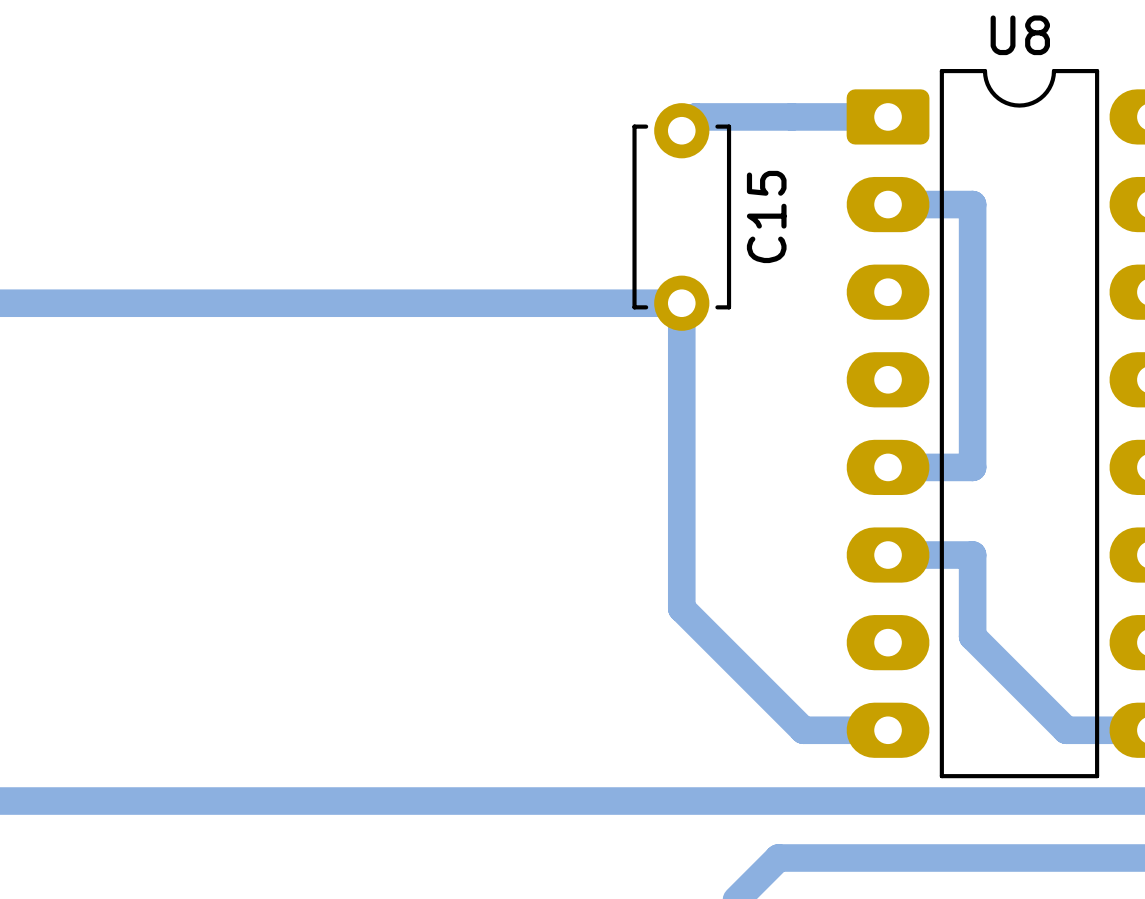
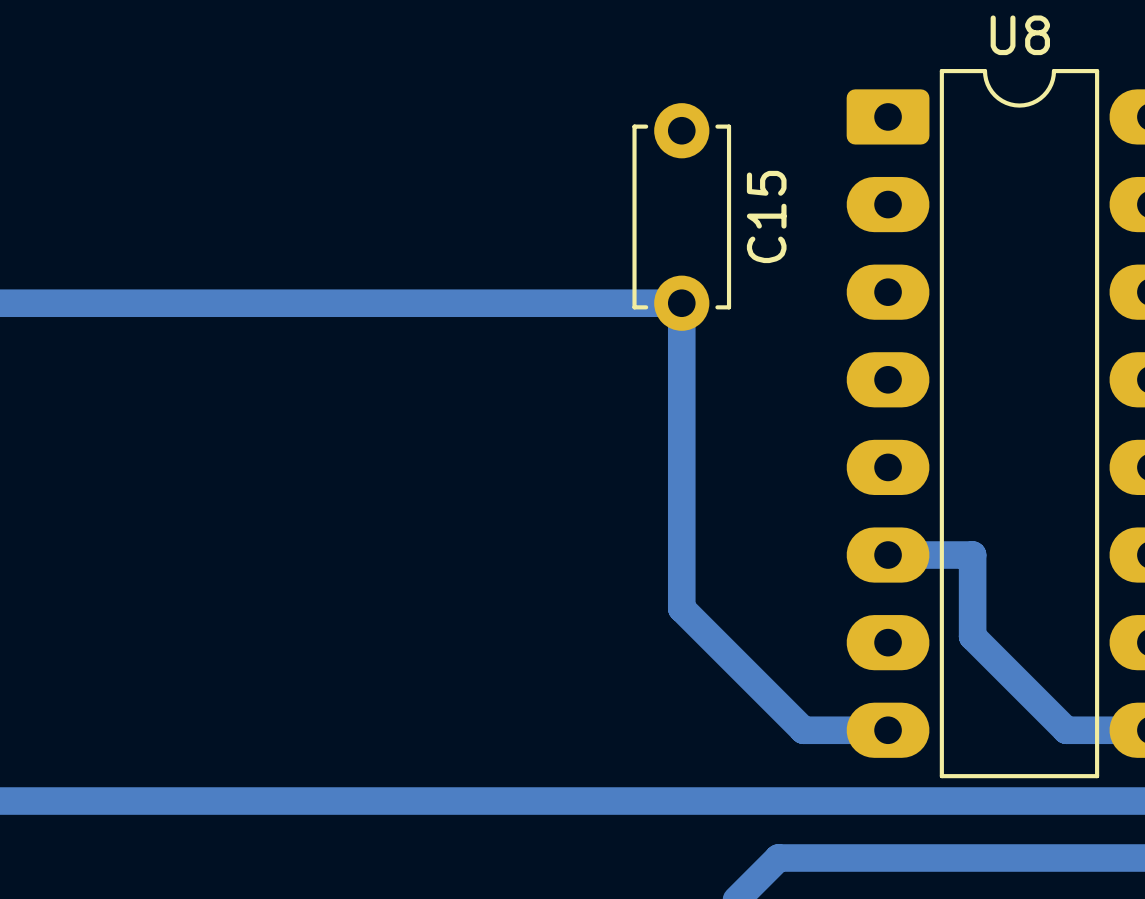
bottom track: (888, 116) (695, 116) (681, 130) -> none
bottom track: (888, 204) (972, 204) (972, 467) (888, 467) -> none

